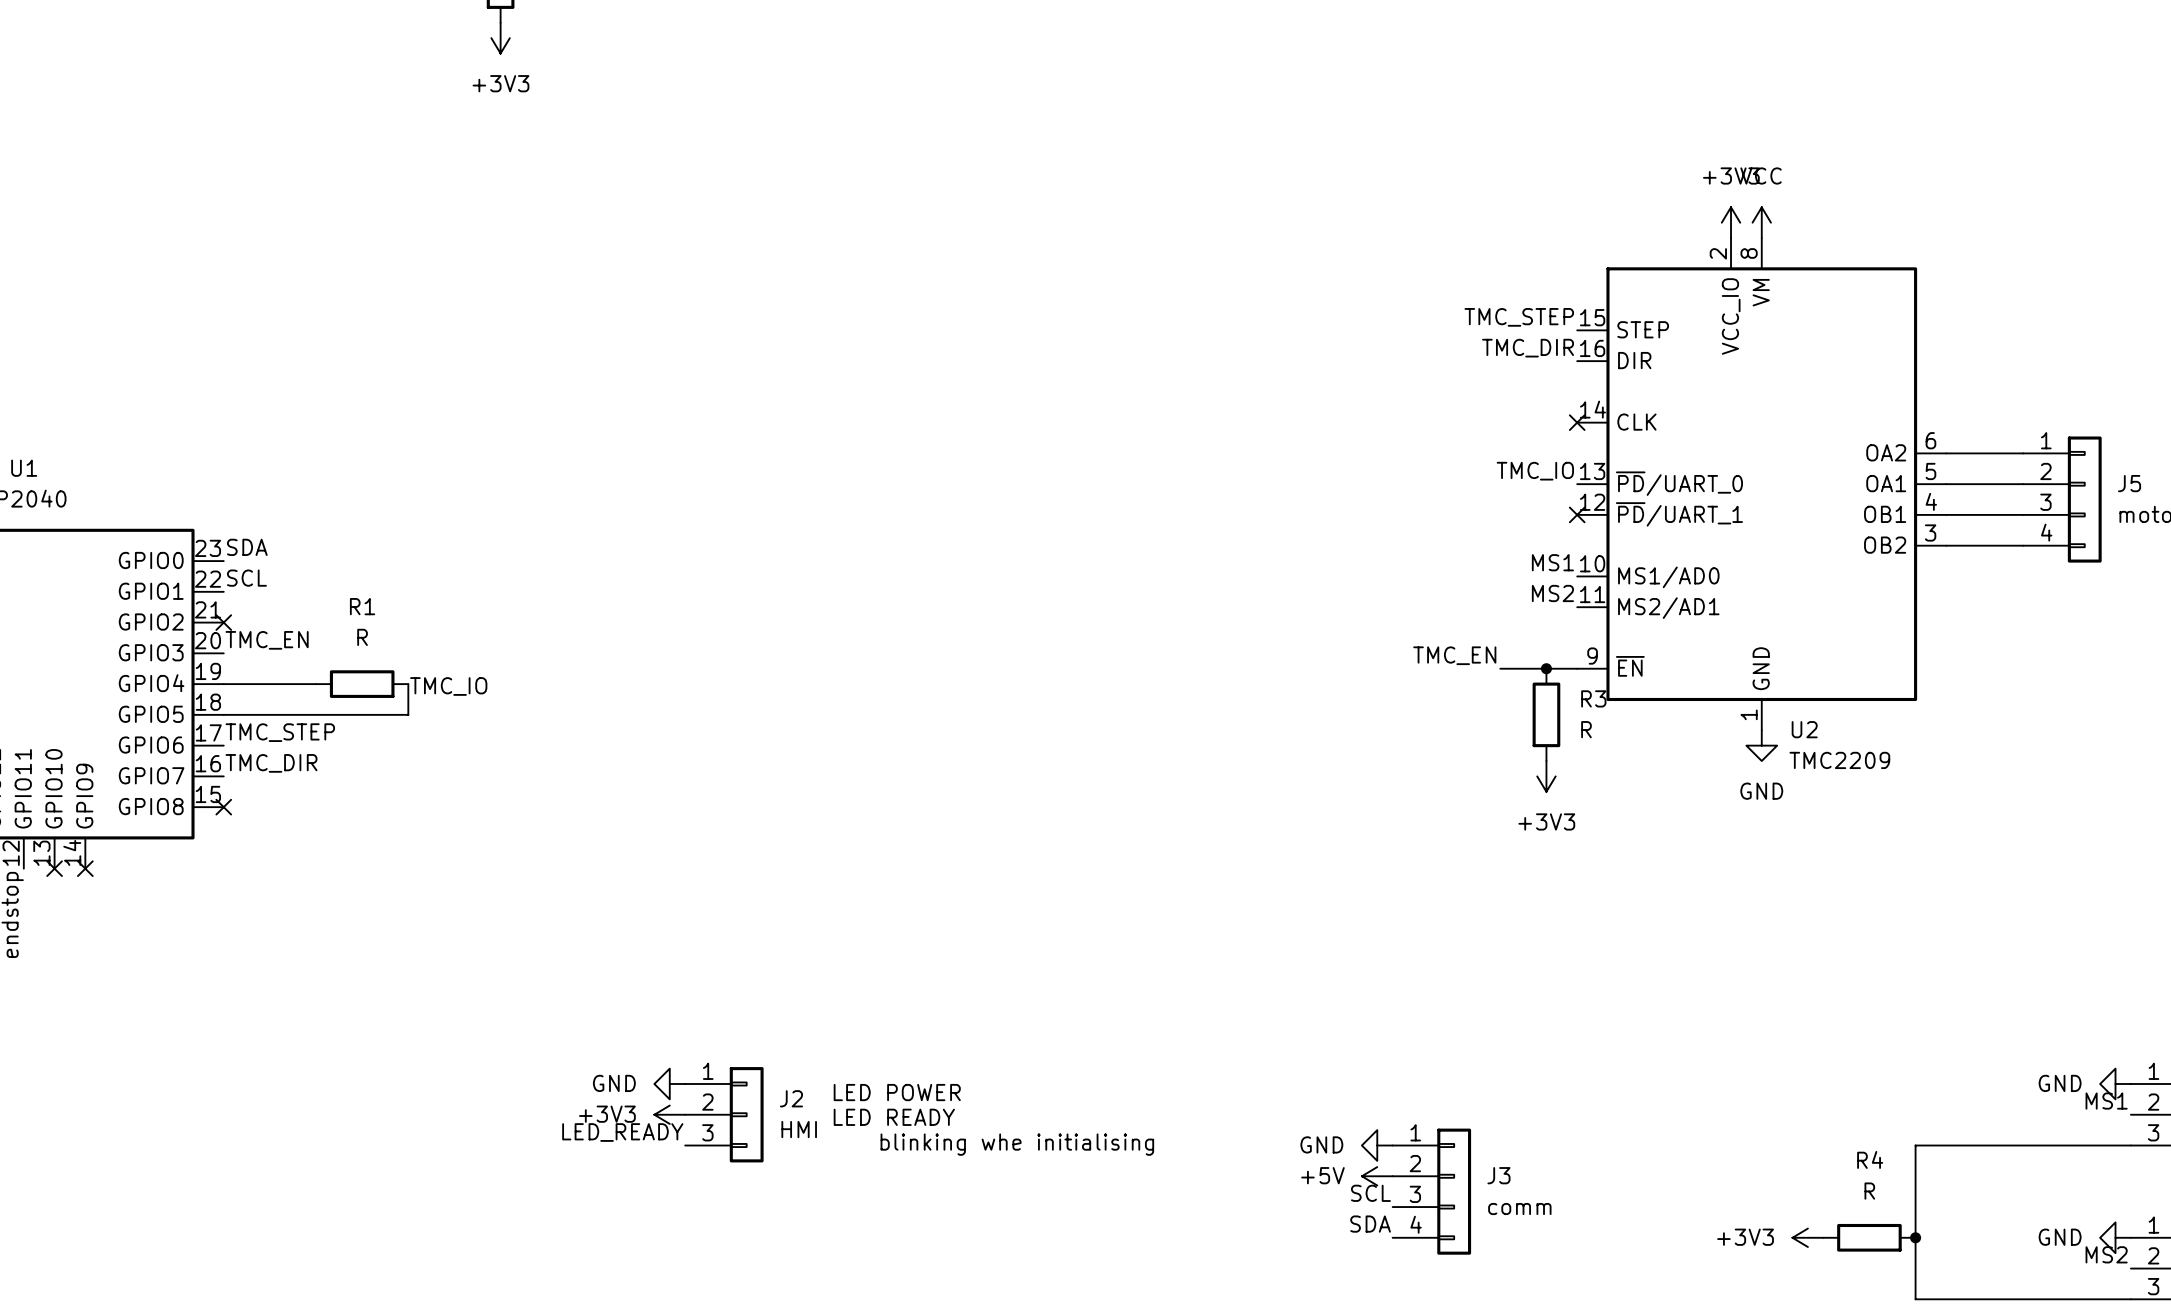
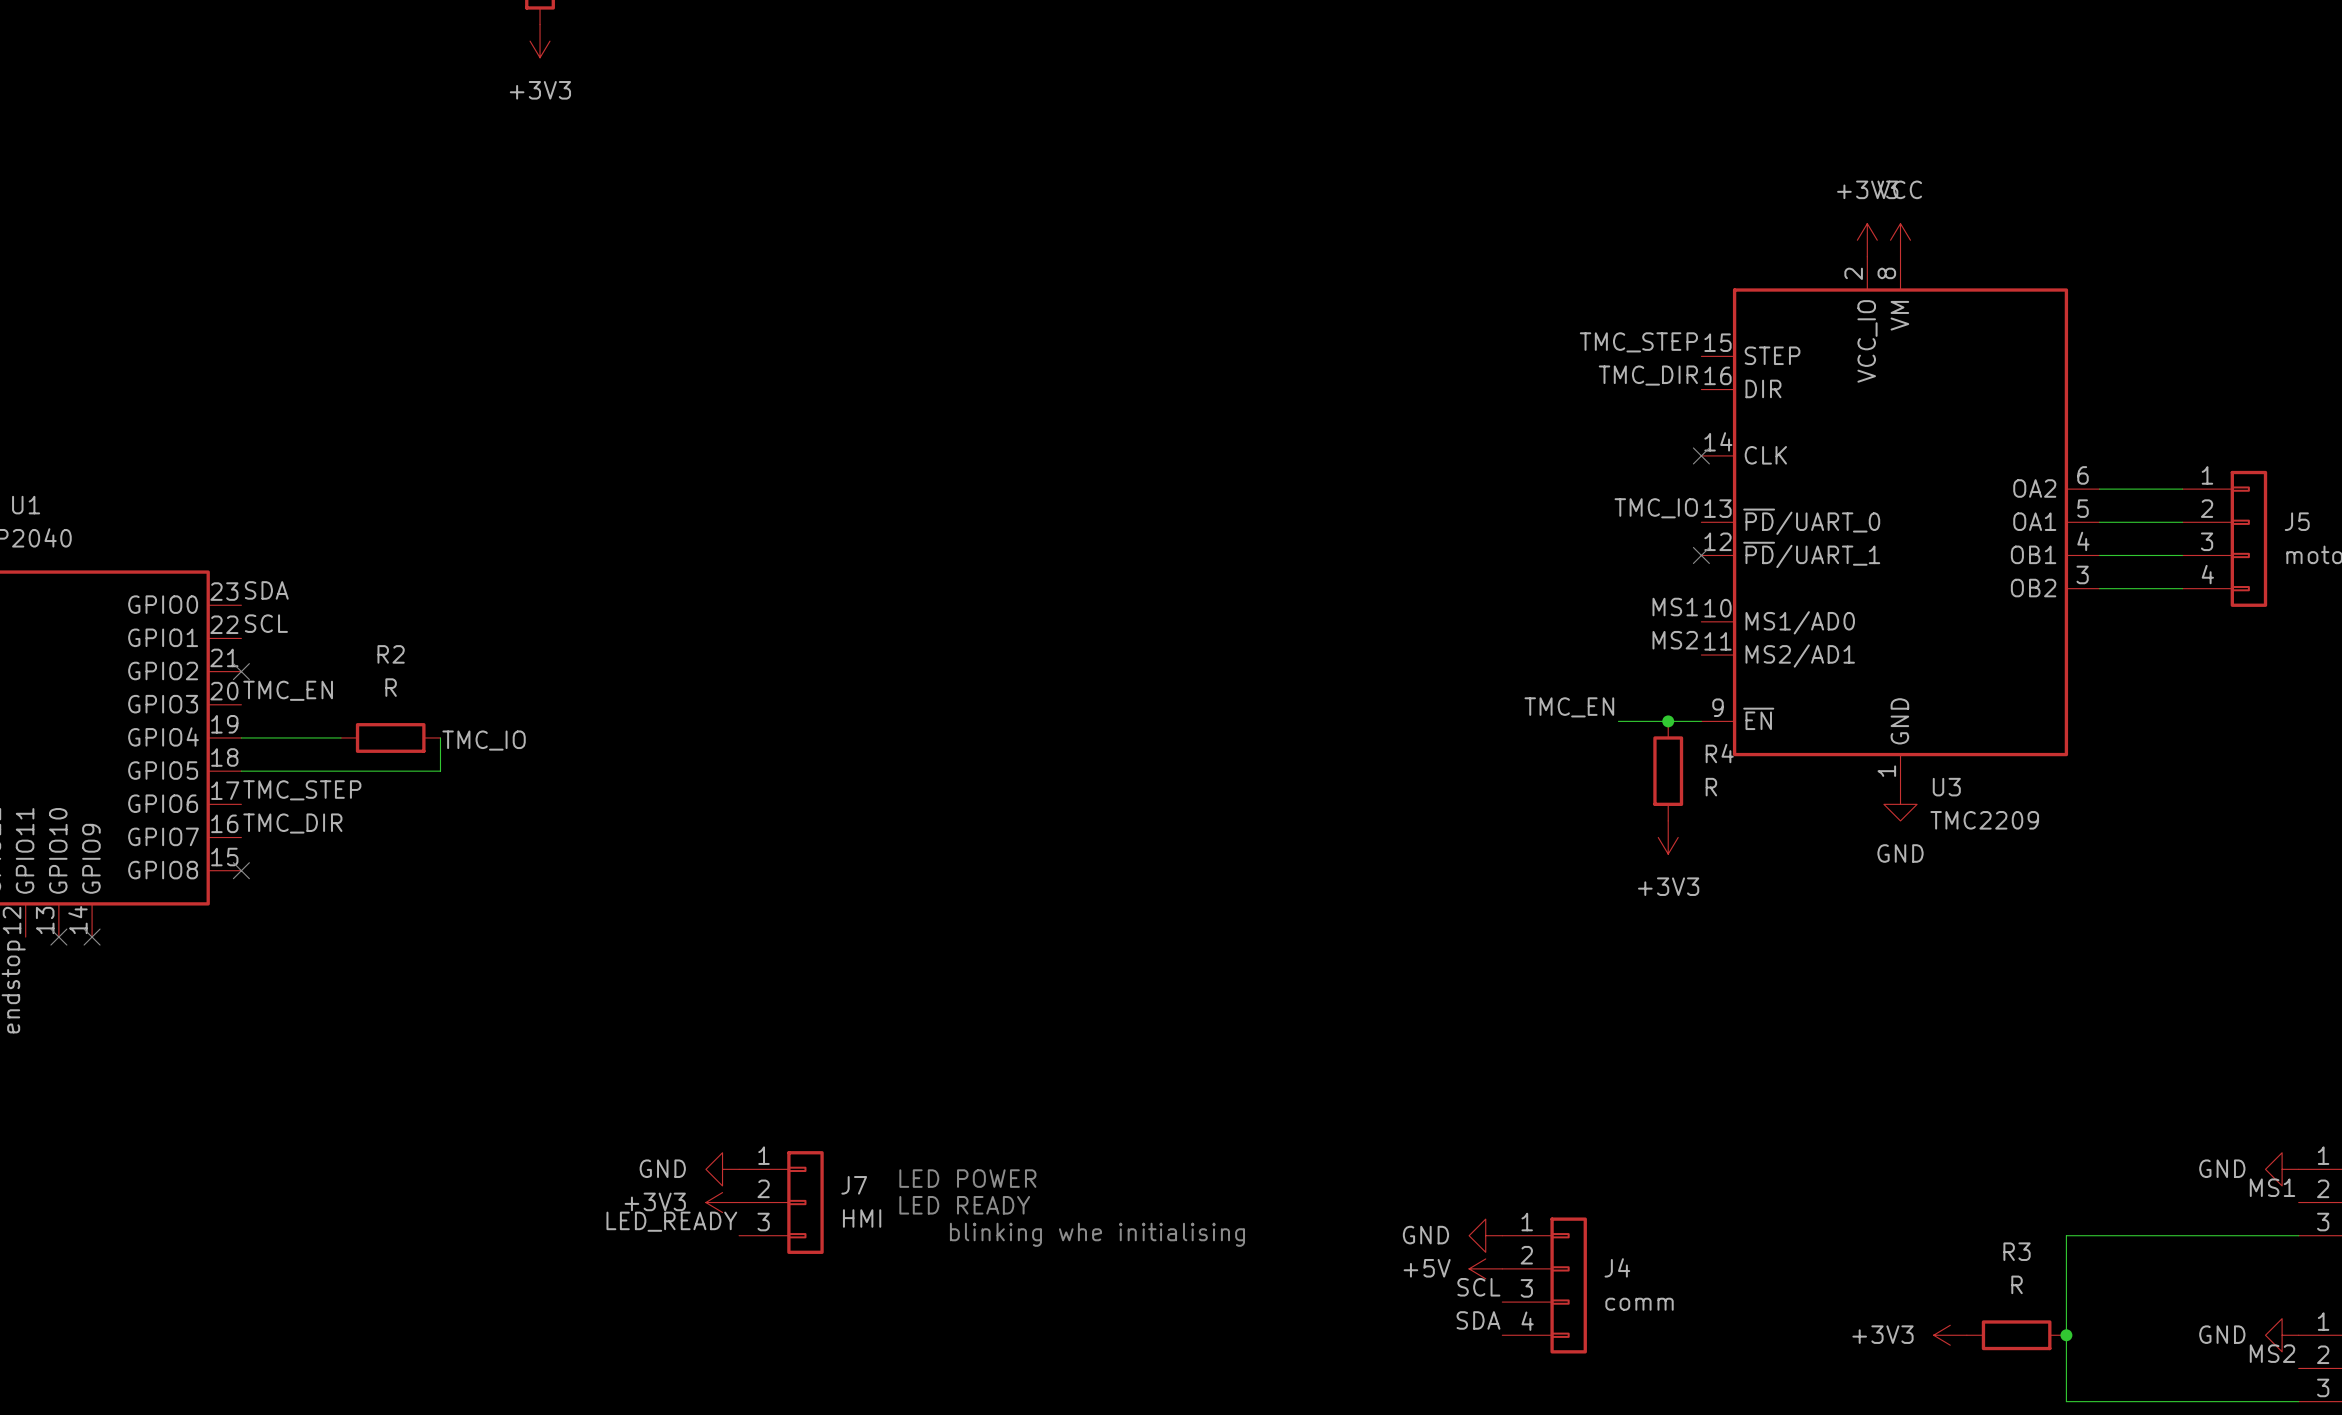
R1 name: R1 (362, 606) -> R2 (391, 654)
R3 name: R3 (1593, 698) -> R4 (1719, 753)
U2 name: U2 (1804, 729) -> U3 (1946, 787)
J2 name: J2 (791, 1098) -> J7 (854, 1185)
R4 name: R4 (1870, 1159) -> R3 (2017, 1251)
J3 name: J3 (1498, 1175) -> J4 (1617, 1267)

